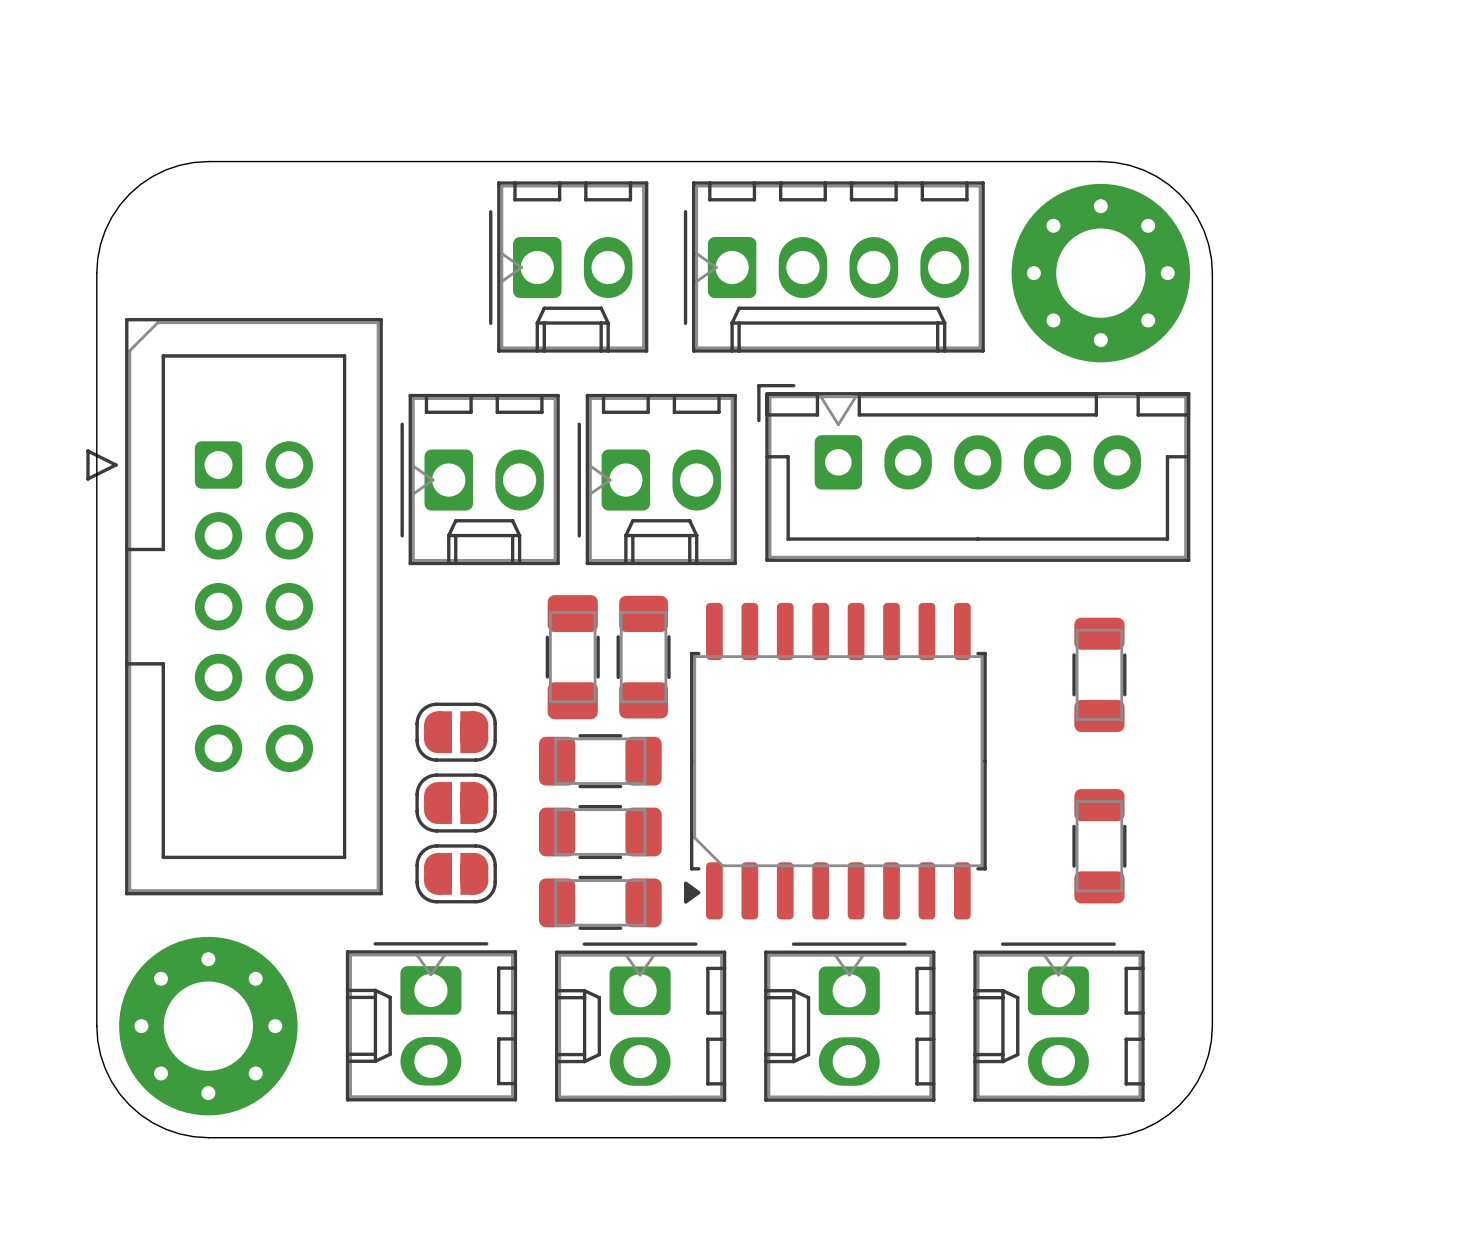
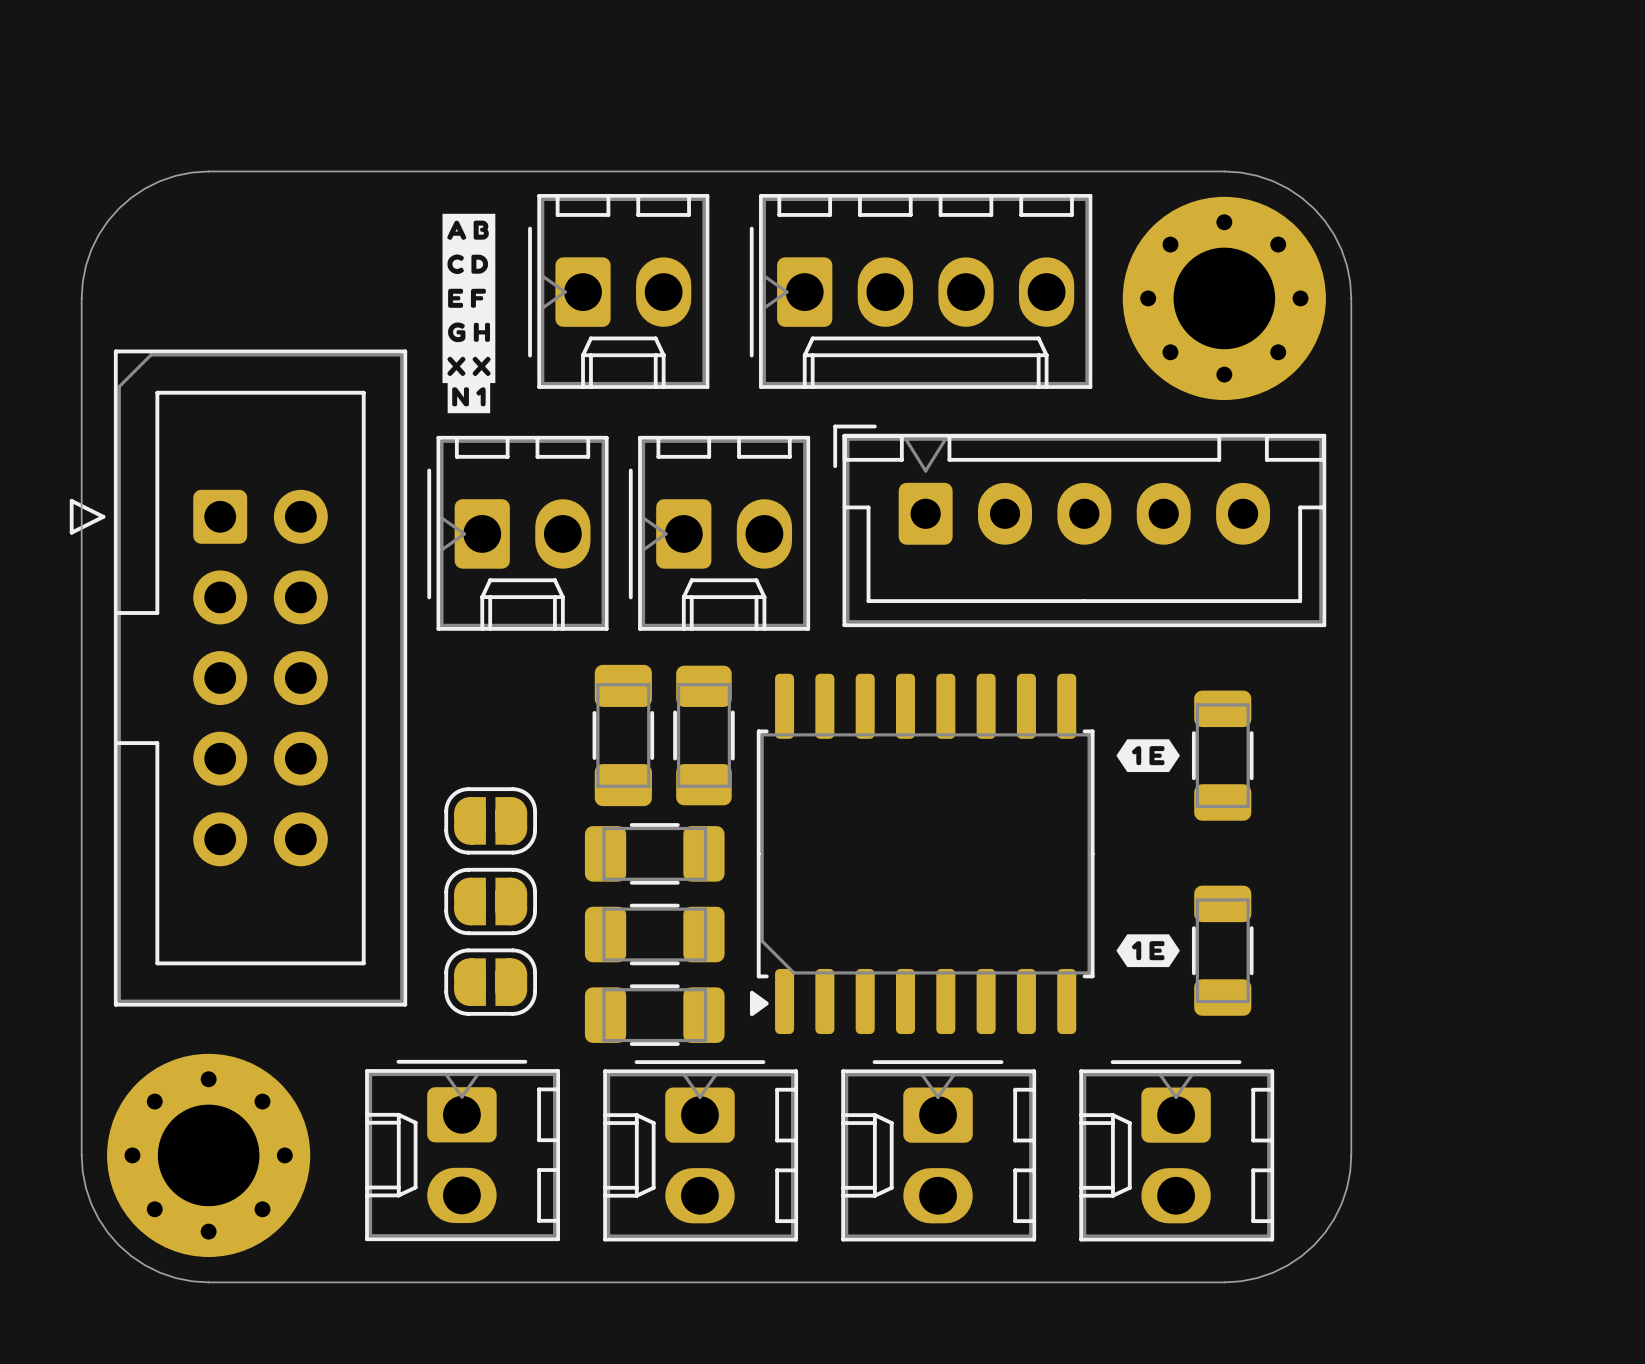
drawing: none -> [442, 213, 496, 414]
drawing: none -> [1116, 739, 1180, 773]
drawing: none -> [1116, 934, 1180, 968]

